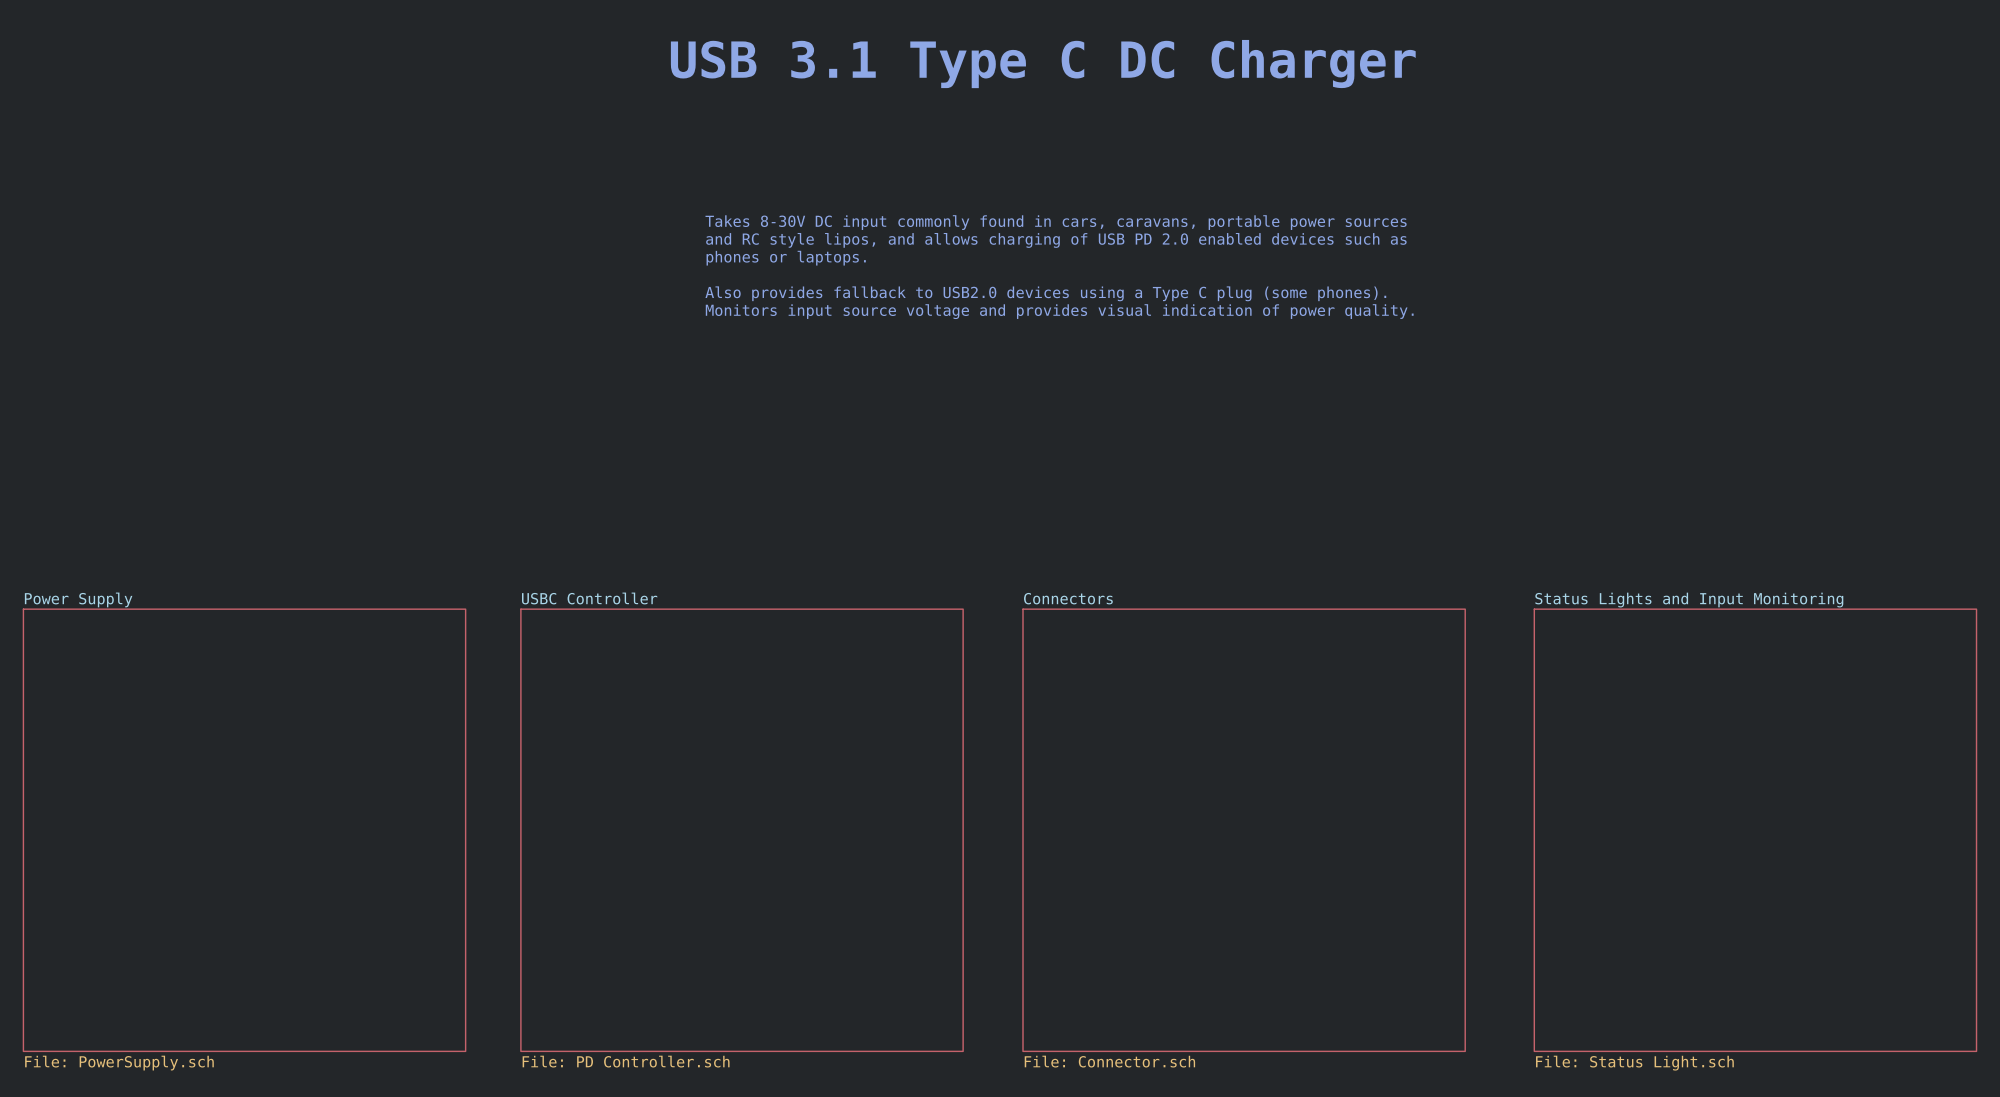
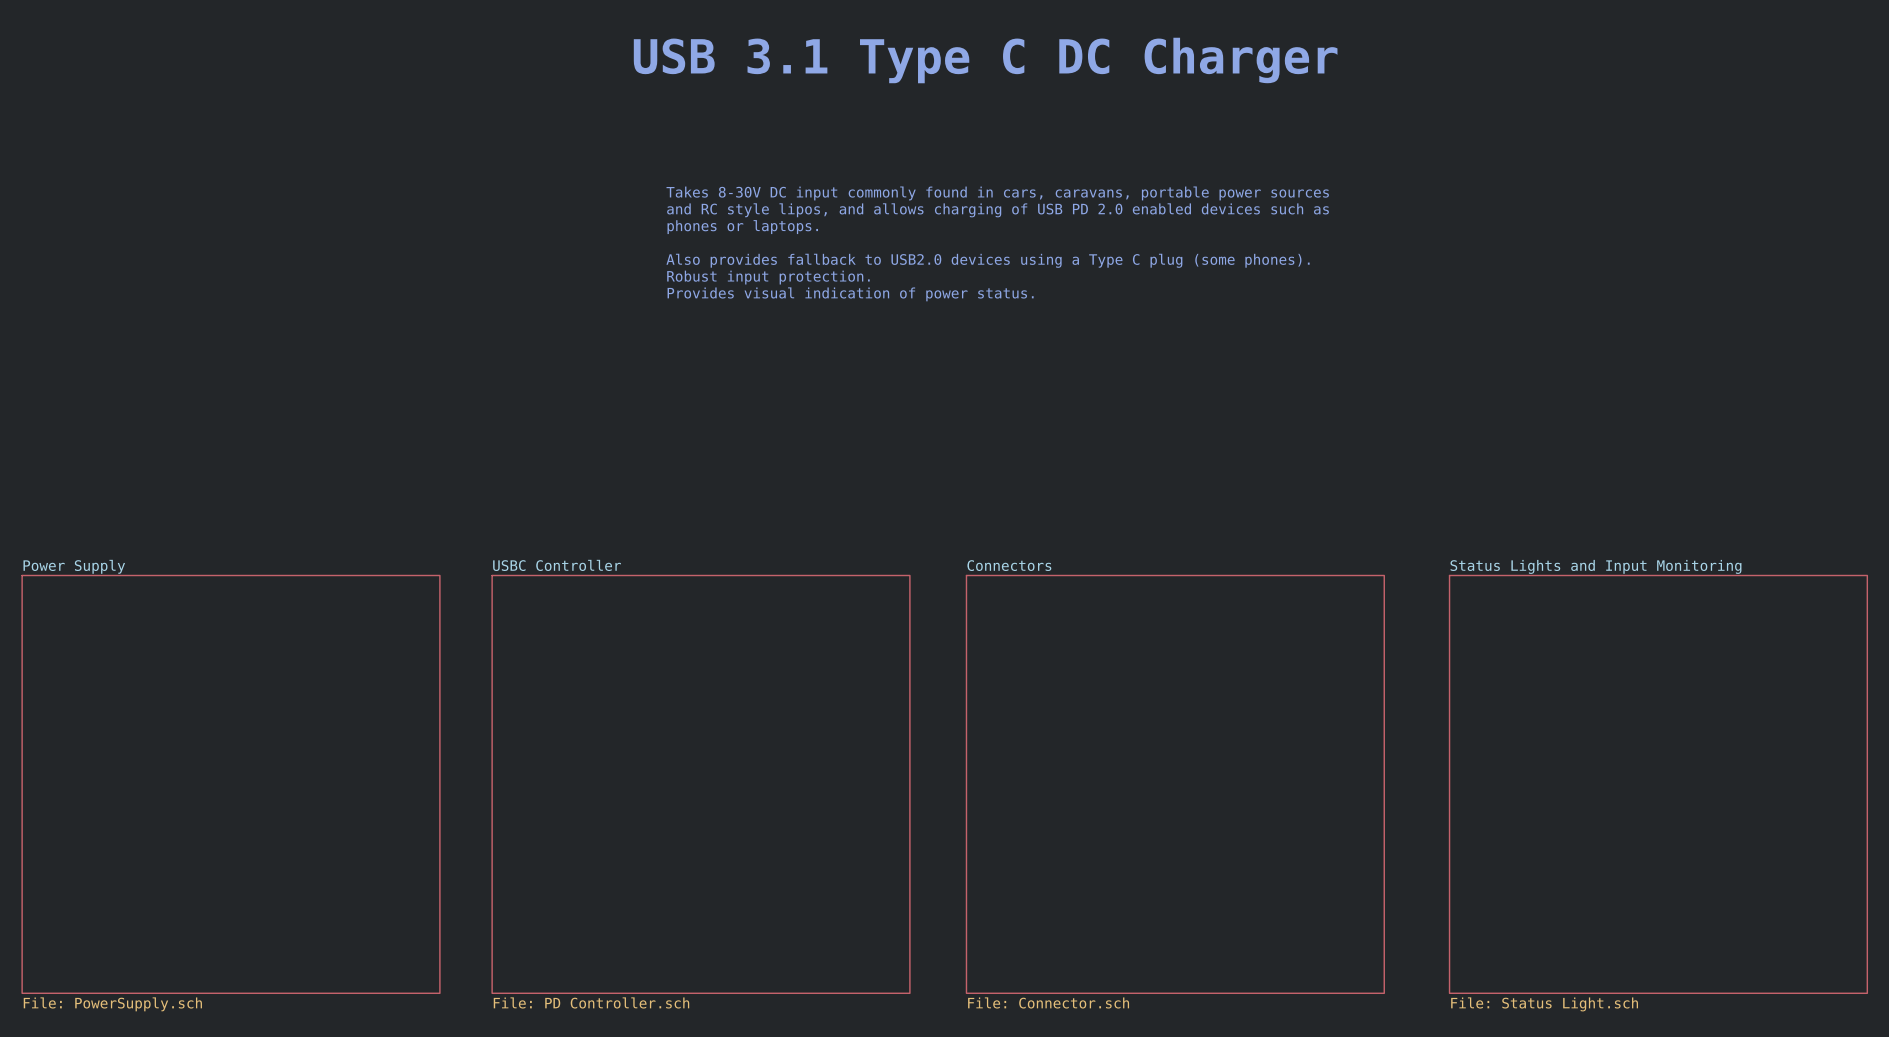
text: none -> Takes 8-30V DC input commonly found in cars, caravans, portable power sources (997, 193)
text: Takes 8-30V DC input commonly found in cars, caravans, portable power sources (1056, 222) -> and RC style lipos, and allows charging of USB PD 2.0 enabled devices such as (998, 210)
text: and RC style lipos, and allows charging of USB PD 2.0 enabled devices such as (1056, 240) -> phones or laptops. (742, 227)
text: phones or laptops. (786, 258) -> none
text: none -> Also provides fallback to USB2.0 devices using a Type C plug (some phones). (988, 260)
text: Also provides fallback to USB2.0 devices using a Type C plug (some phones). (1045, 293) -> Robust input protection. (768, 277)
text: Monitors input source voltage and provides visual indication of power quality. (1059, 311) -> Provides visual indication of power status. (850, 294)

